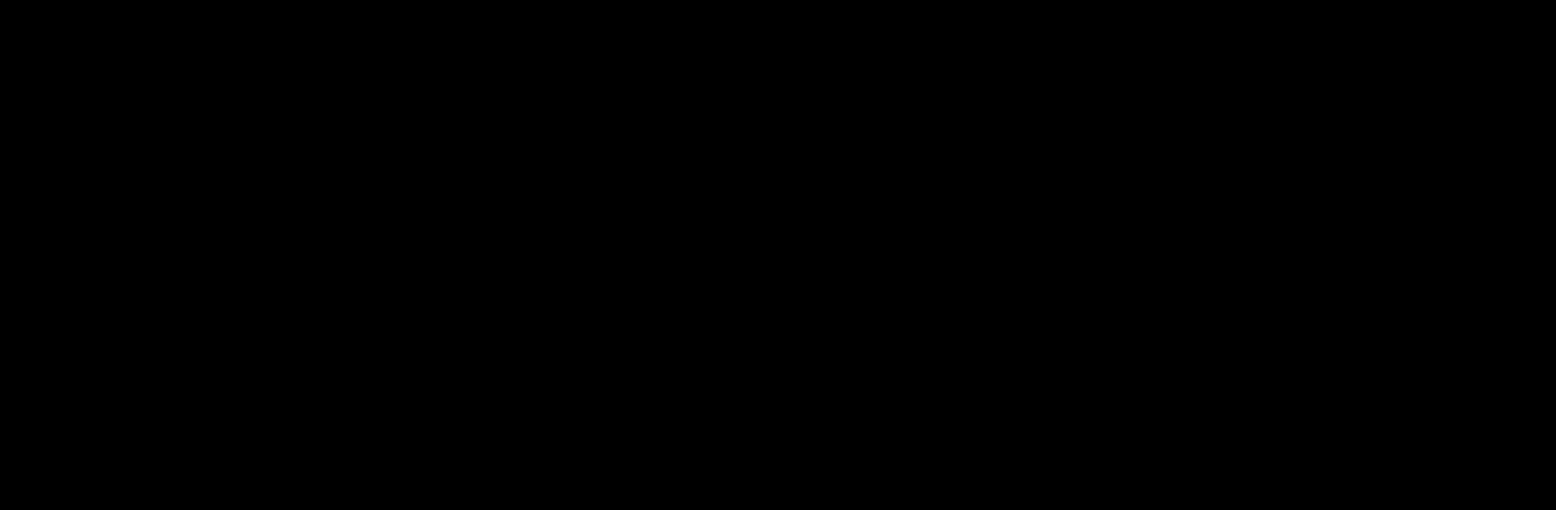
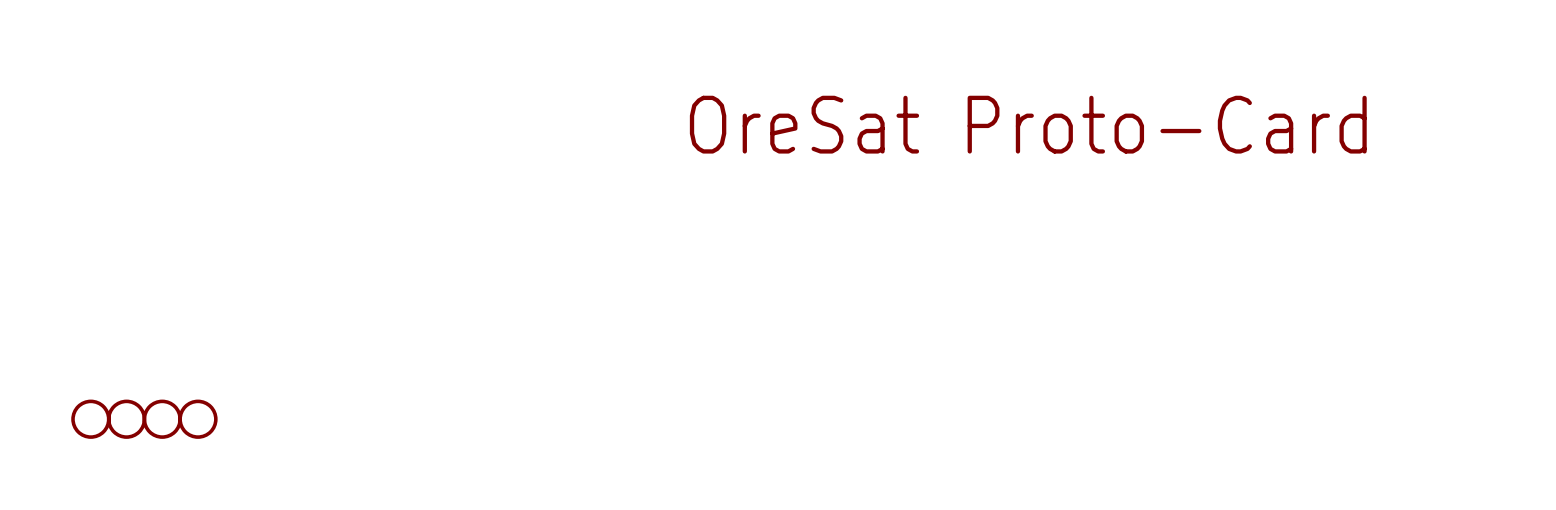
text: none -> OreSat Proto-Card (1028, 124)
part: none -> (90, 419)
part: none -> (126, 419)
part: none -> (162, 419)
part: none -> (197, 419)

